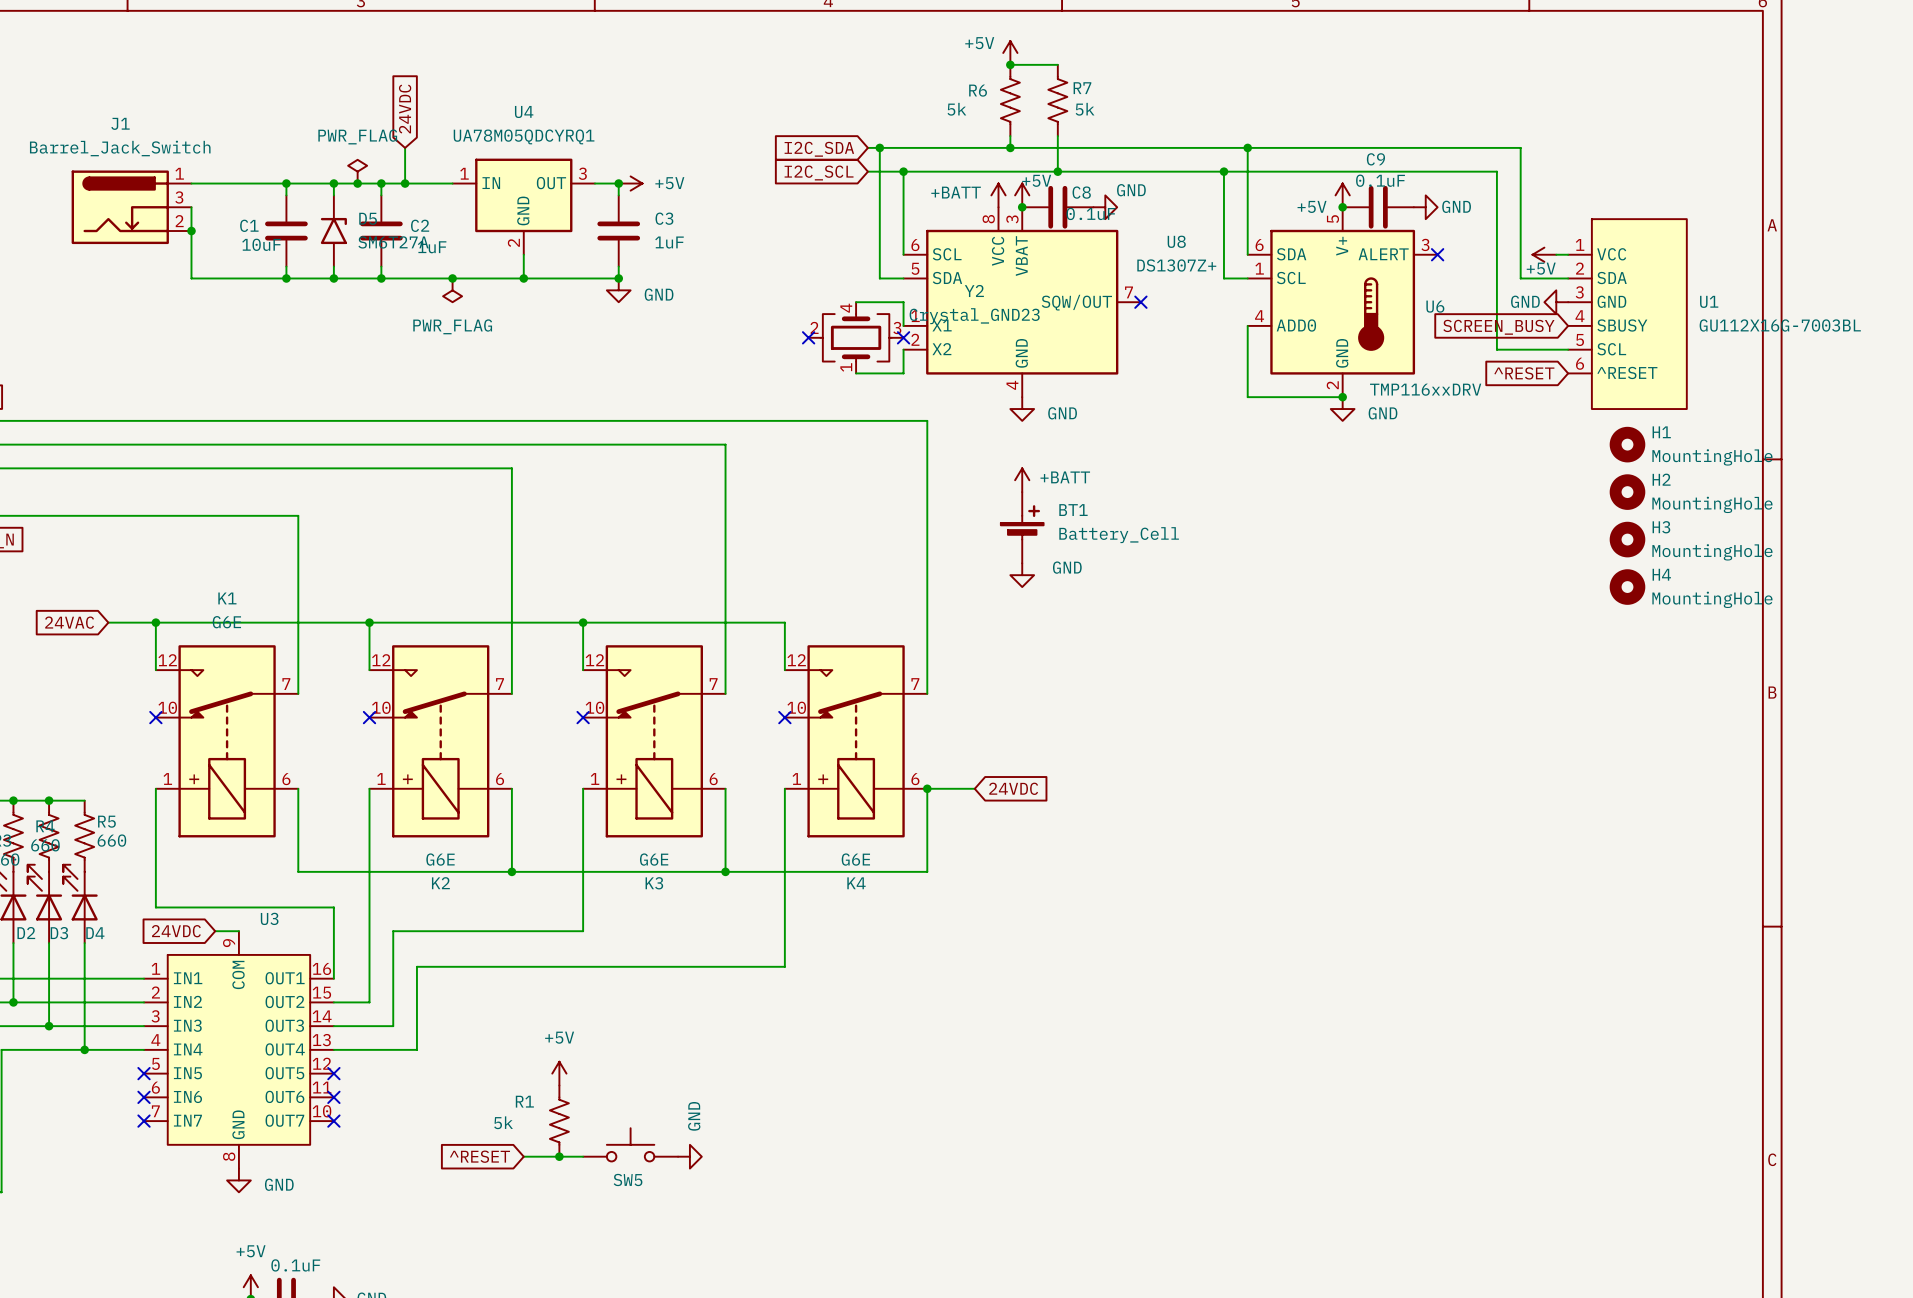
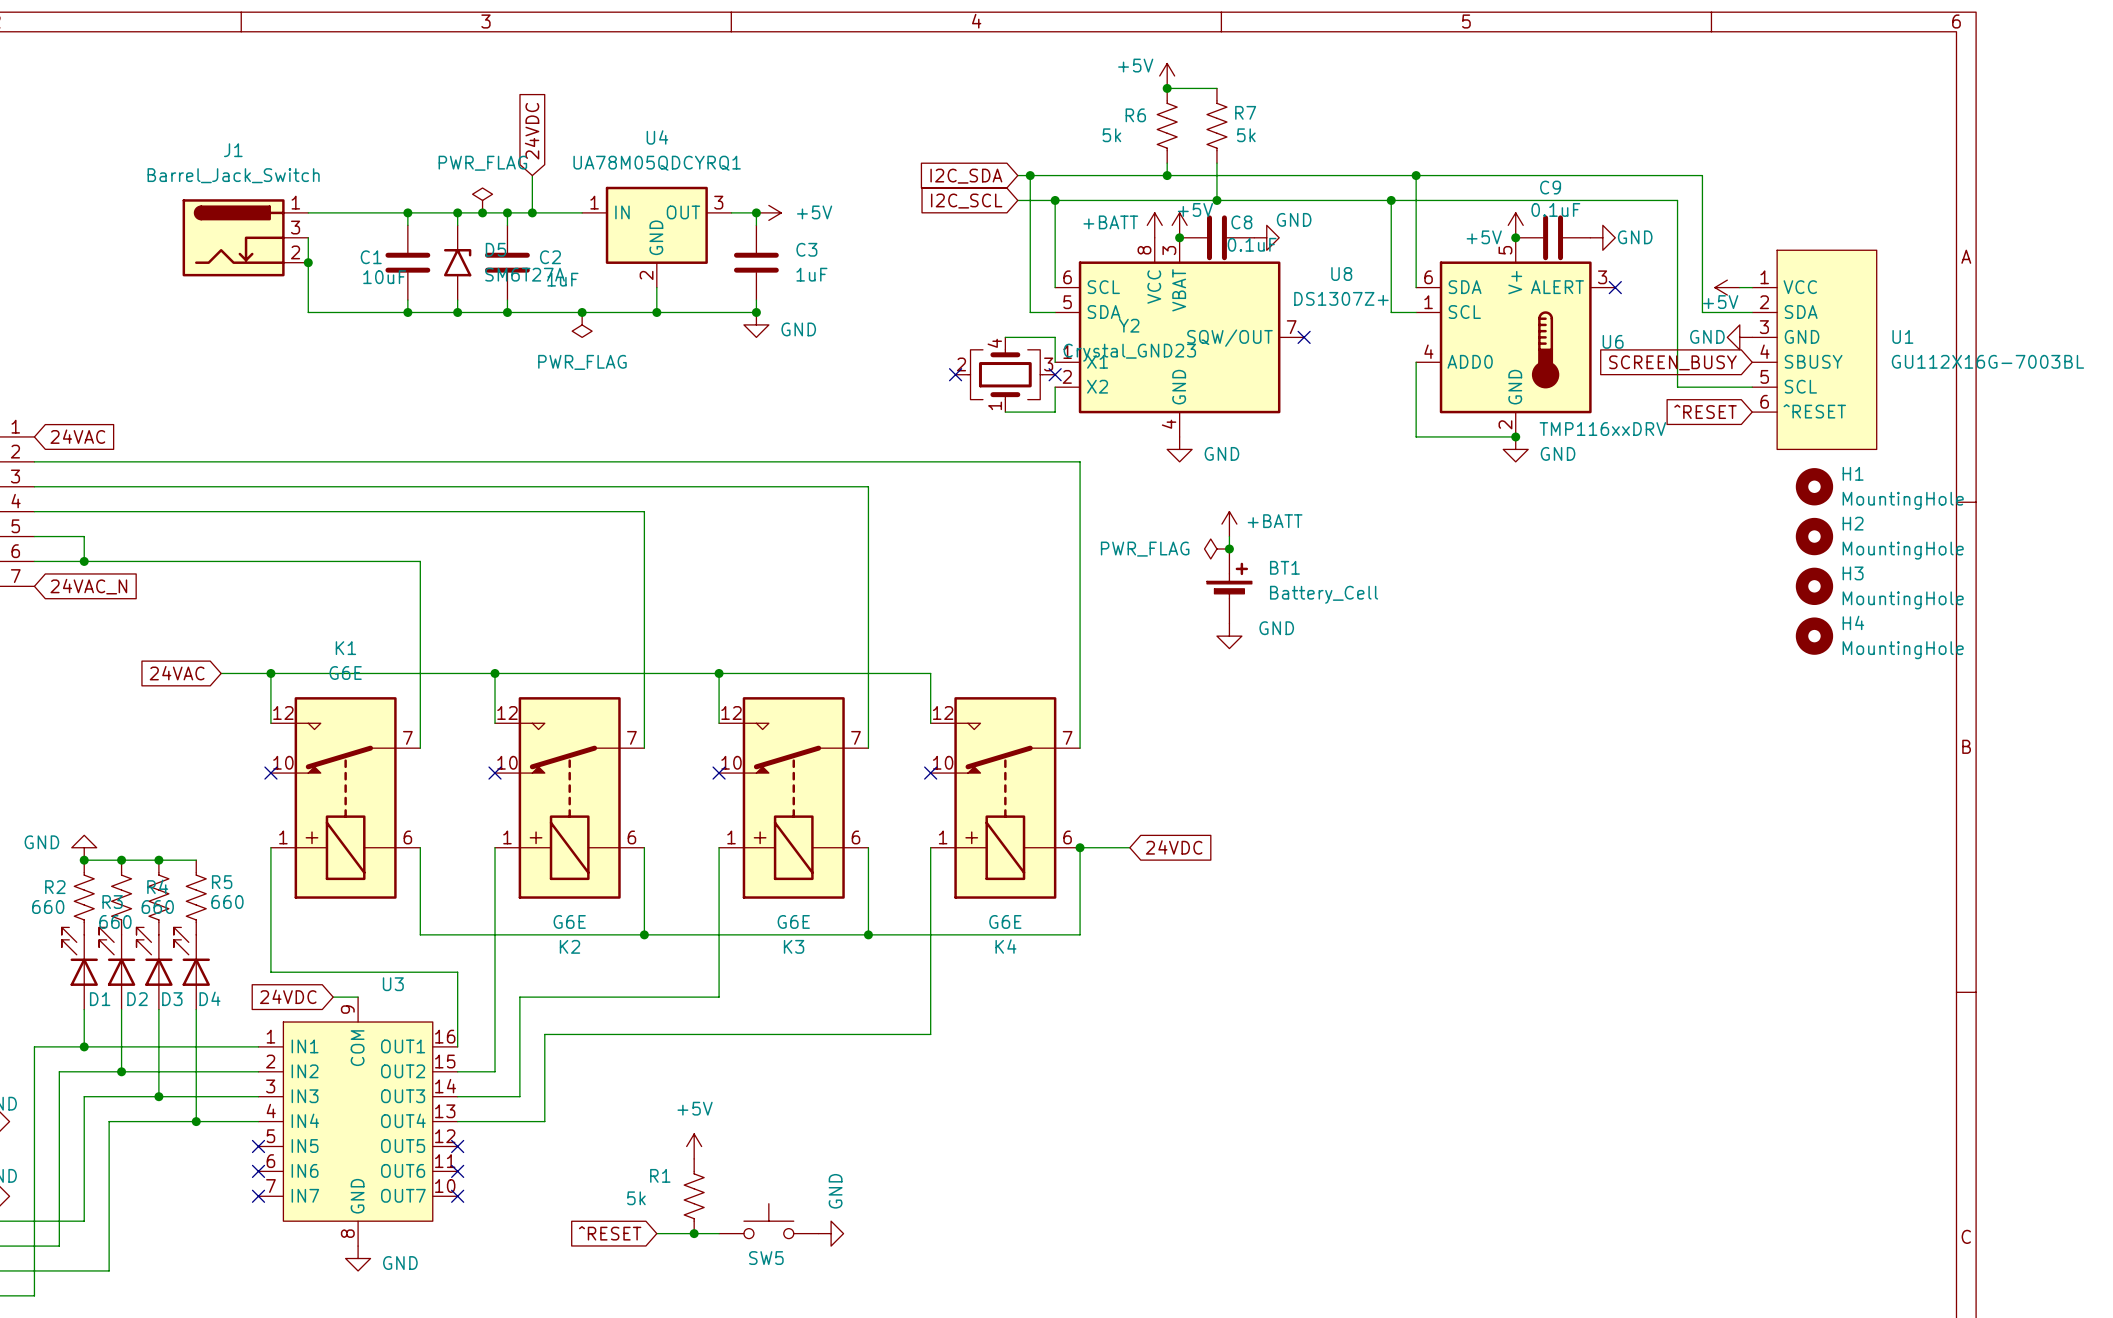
power symbol position: +BATT (1022, 480) -> +BATT (1229, 524)
wire: none -> (1229, 536) (1229, 548)
power symbol: none -> PWR_FLAG (1216, 548)
junction: none -> (1229, 548)
BT1 position: (1022, 527) -> (1229, 586)
power symbol position: GND (1022, 575) -> GND (1229, 636)

